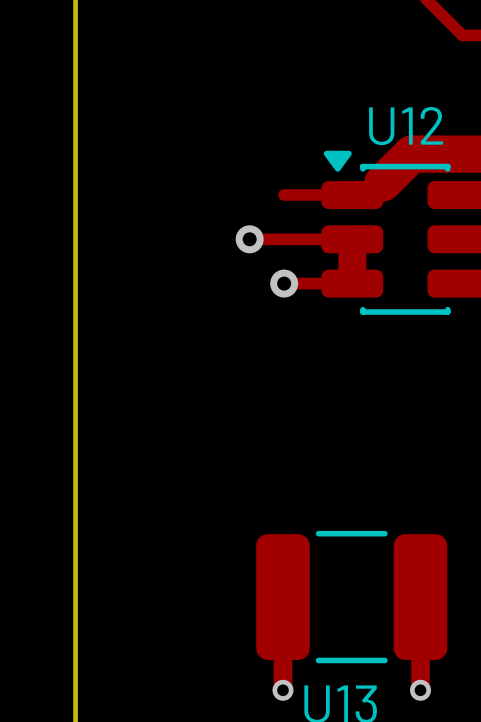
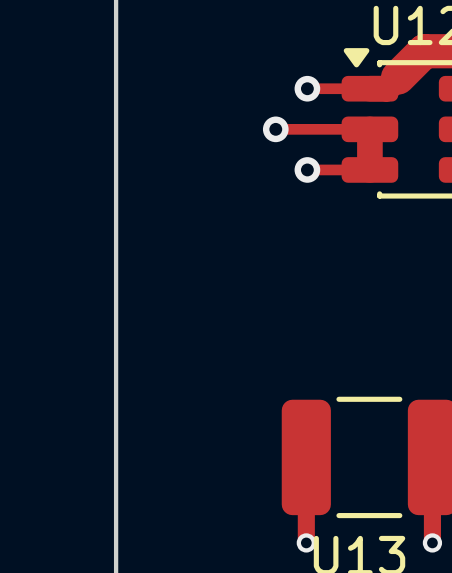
via: none -> (307, 88)

